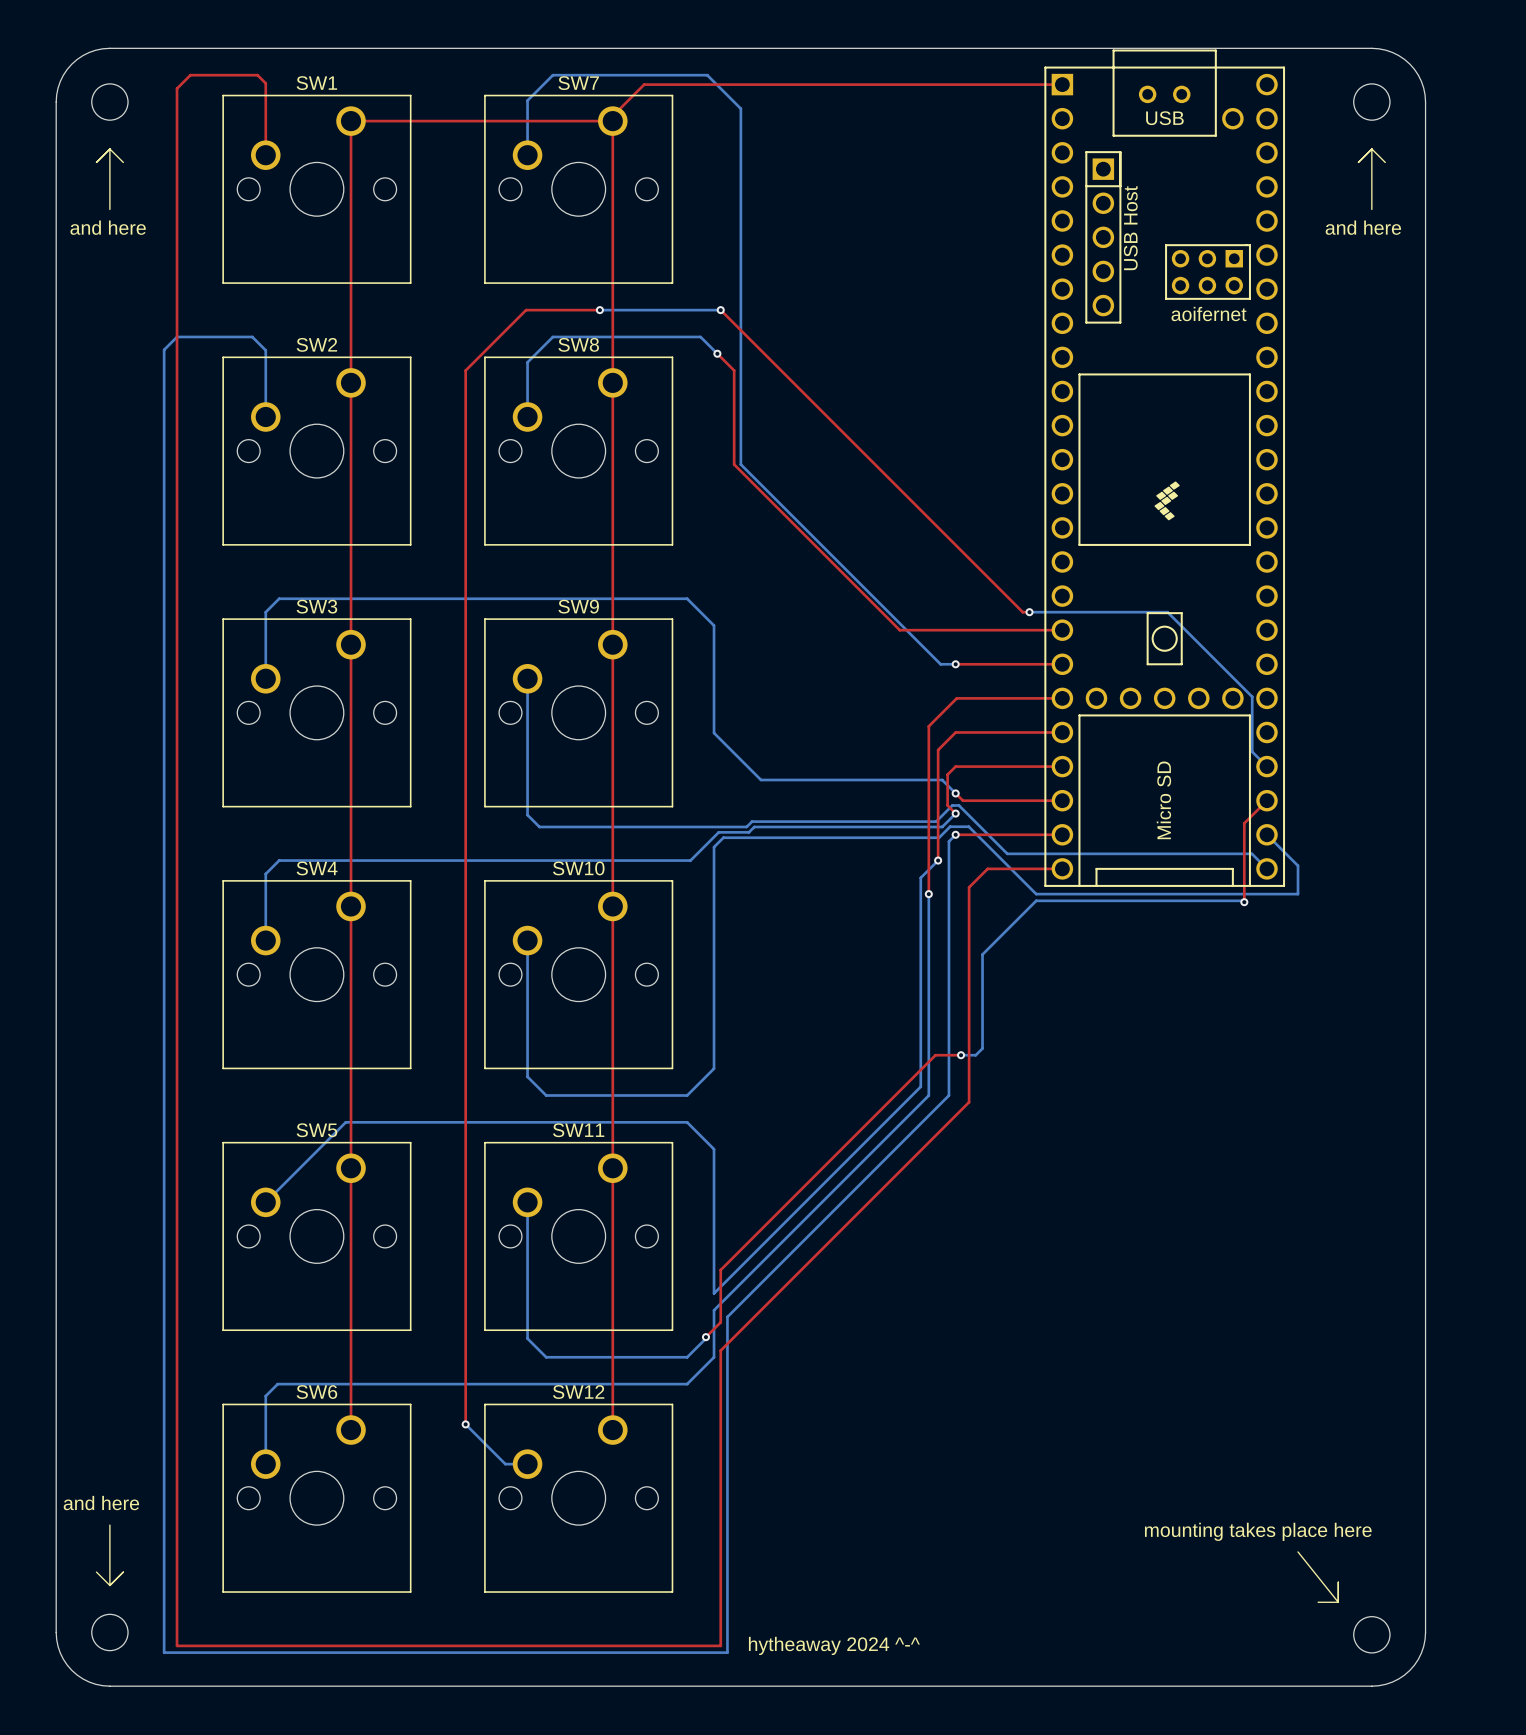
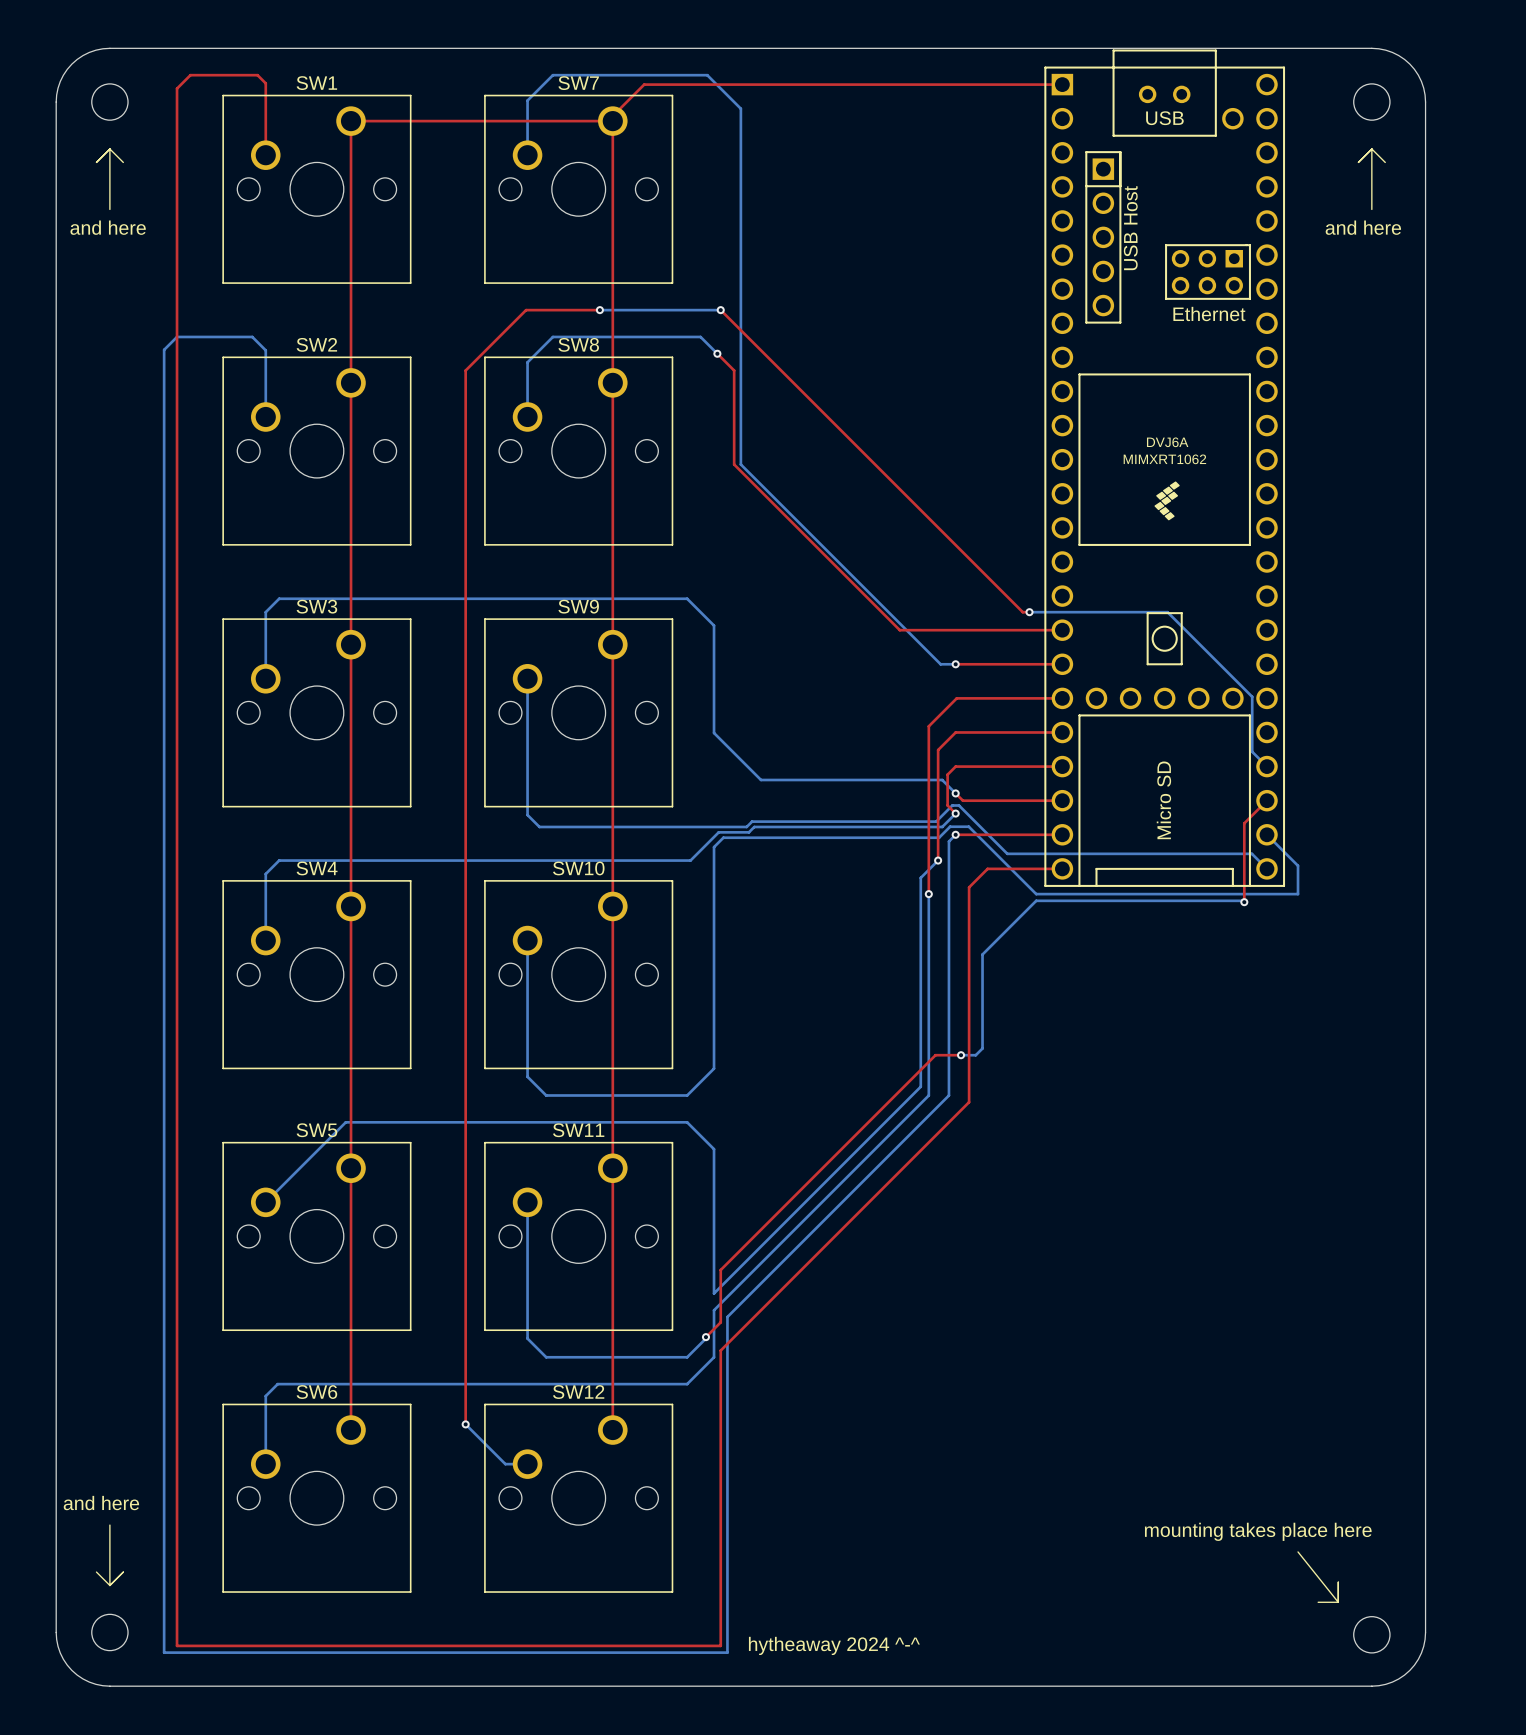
part text: aoifernet (1209, 314) -> Ethernet (1209, 314)
part text: none -> DVJ6A (1167, 442)
part text: none -> MIMXRT1062 (1164, 459)

